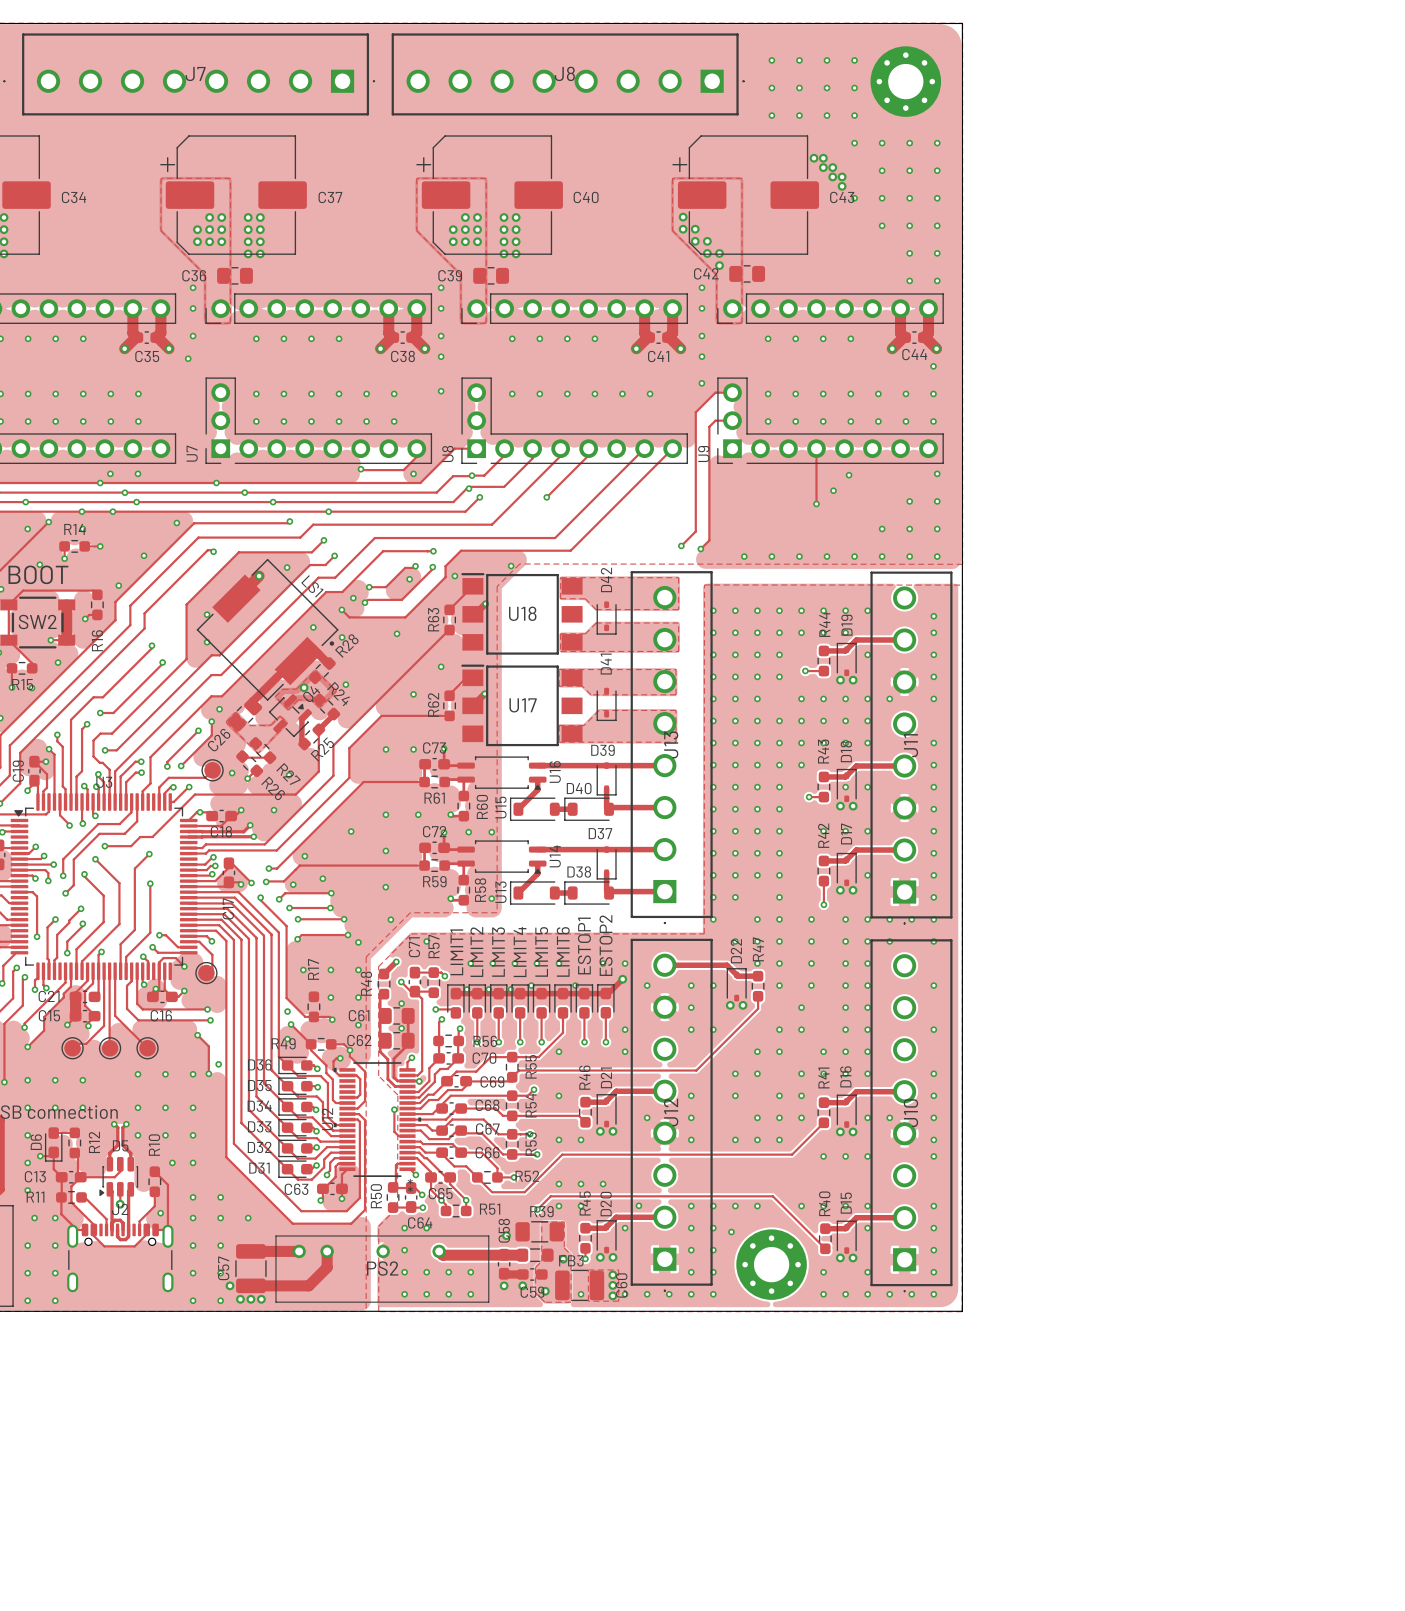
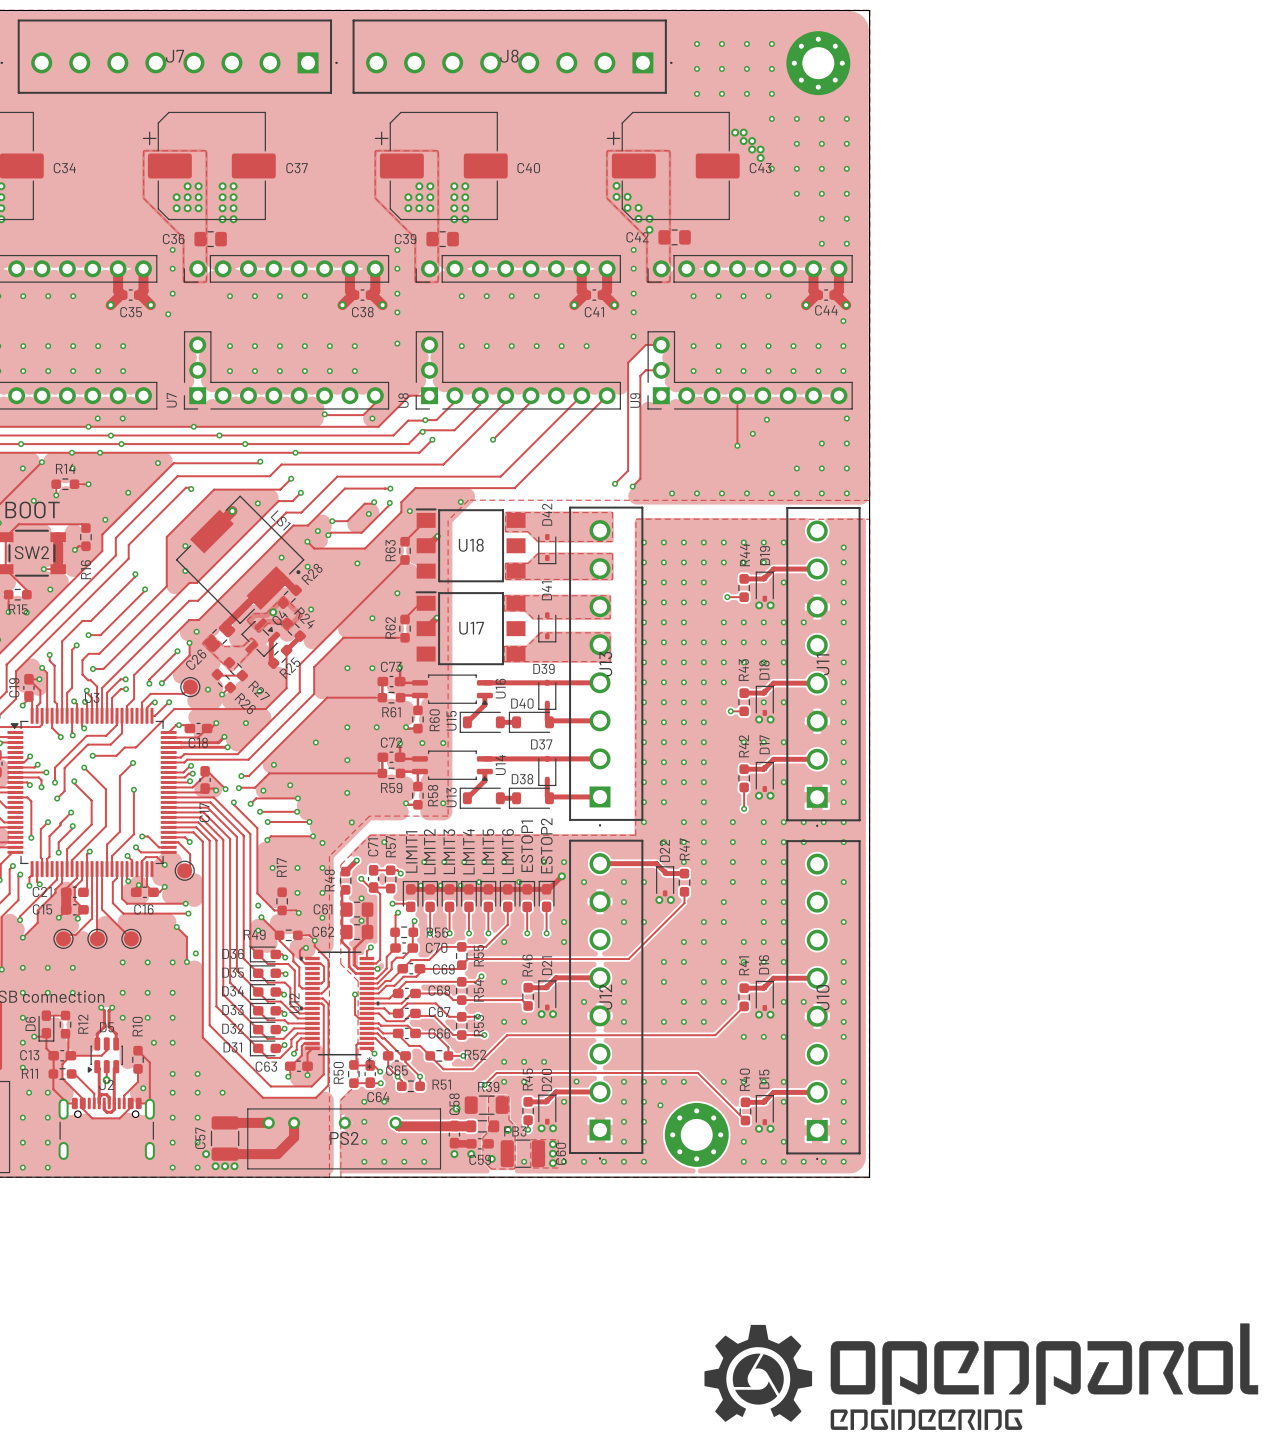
drawing: none -> [830, 1323, 1259, 1430]
drawing: none -> [704, 1324, 813, 1422]

